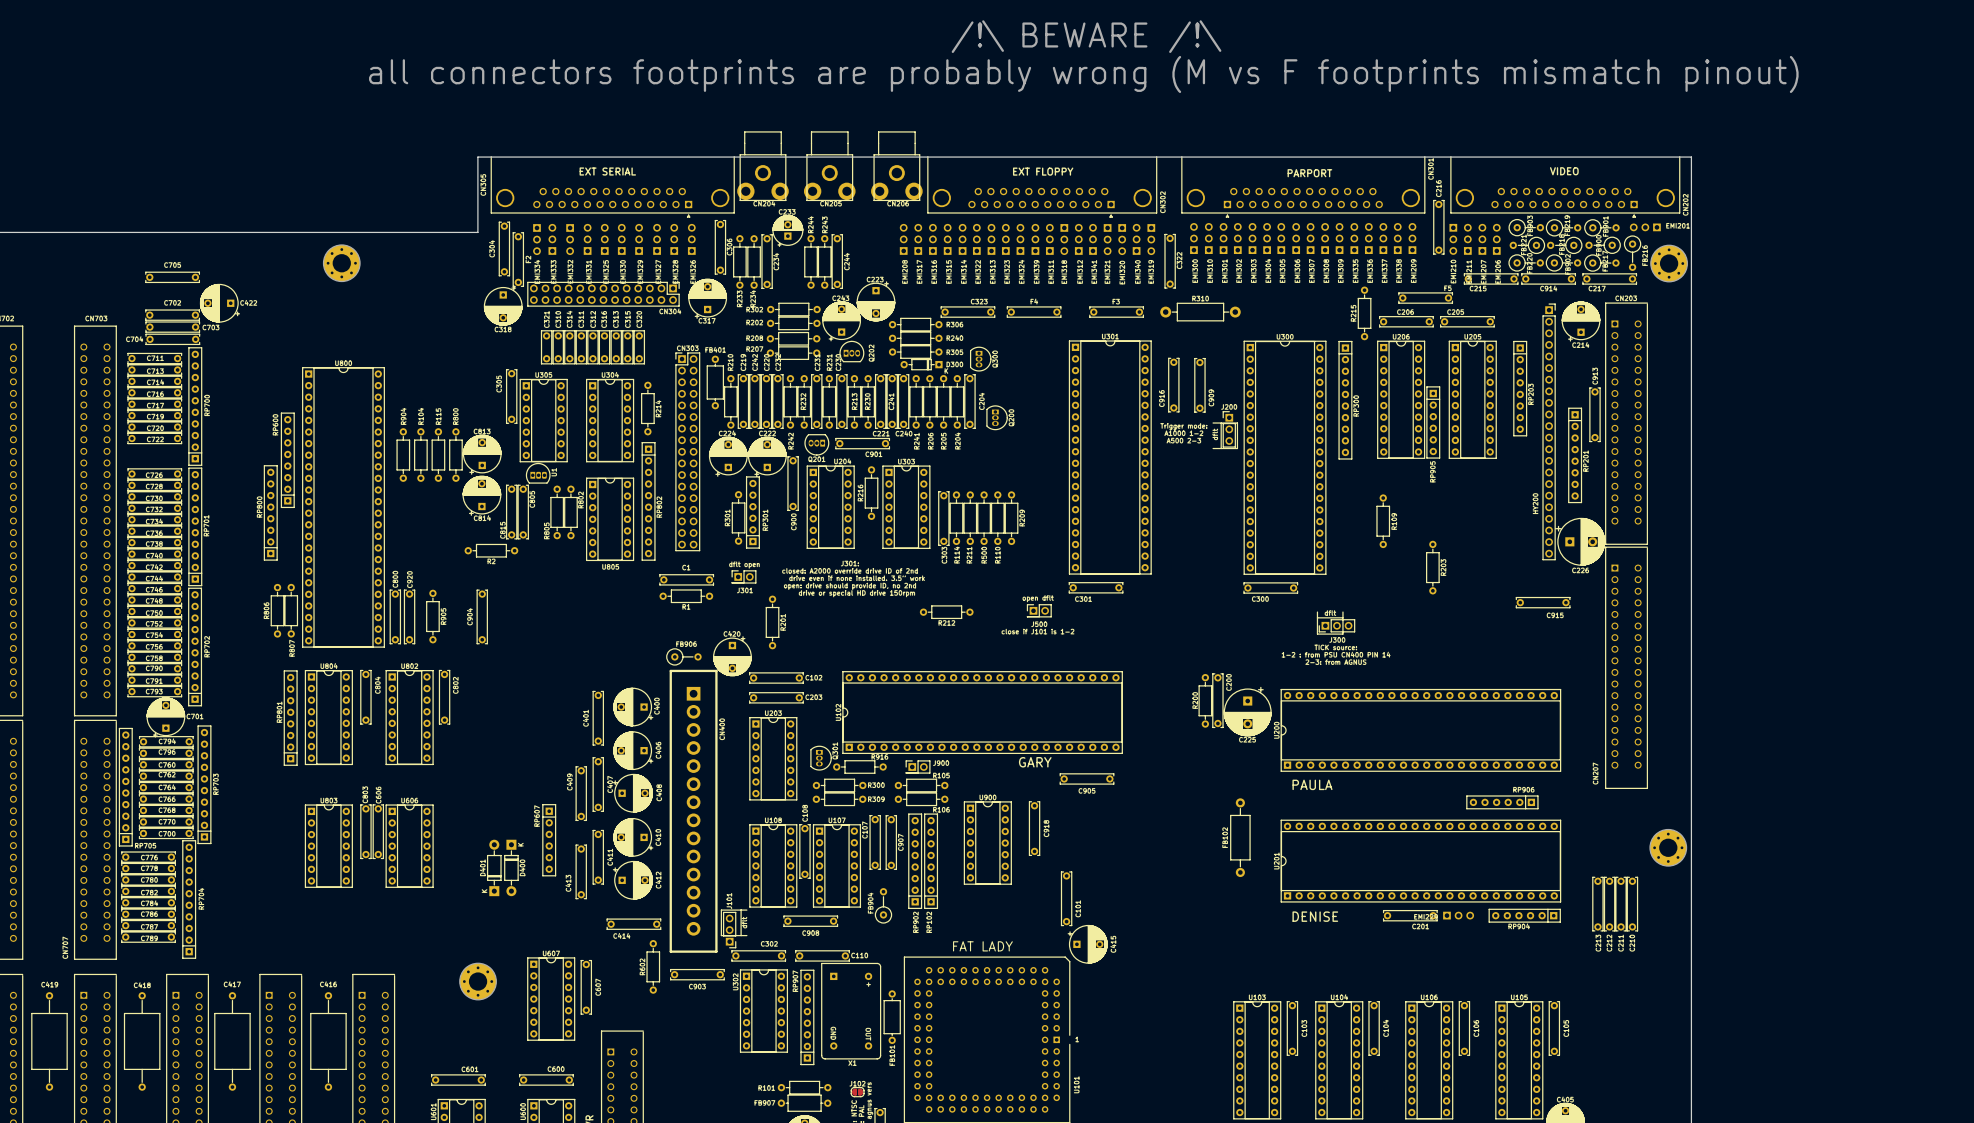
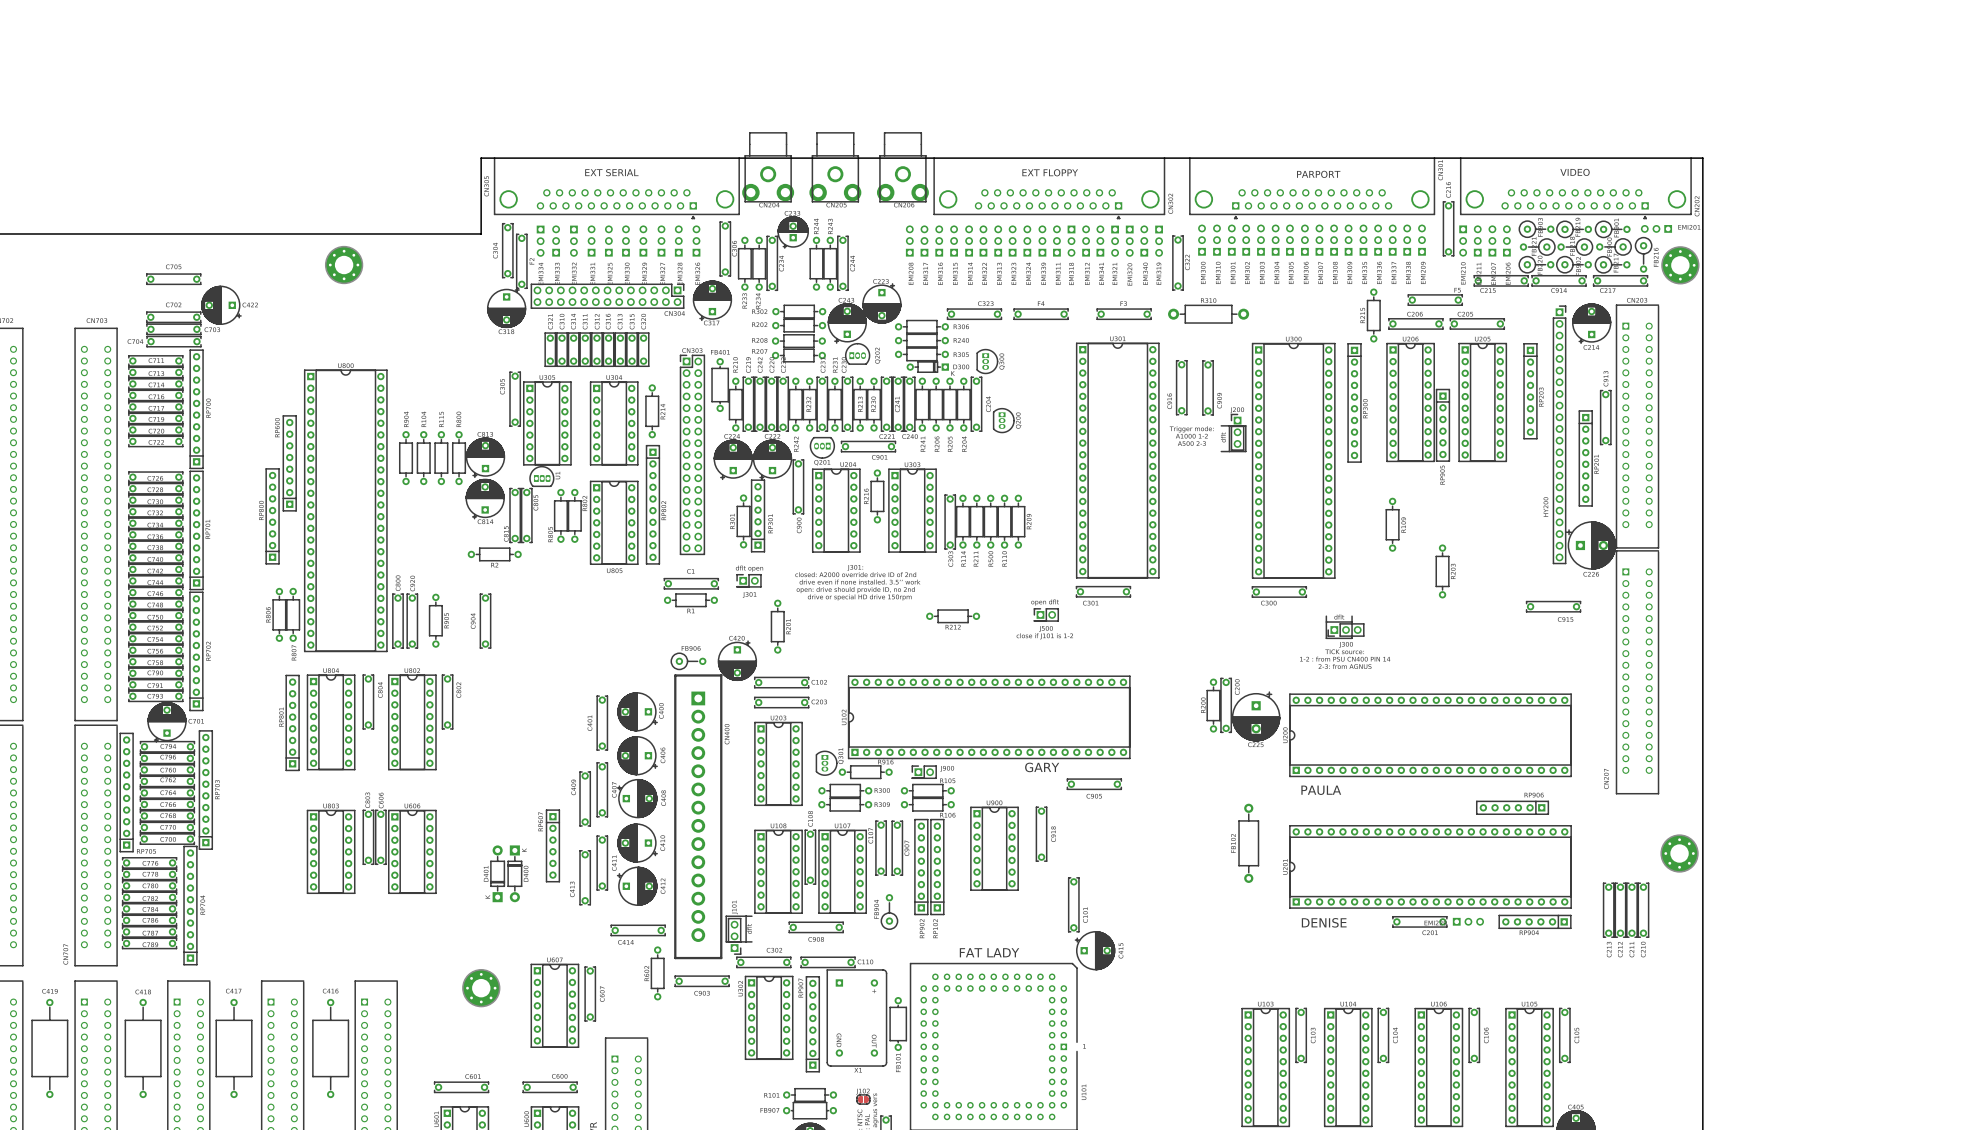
text: /!\ BEWARE /!\ (1086, 36) -> none
text: all connectors footprints are probably wrong (M vs F footprints mismatch pinout) (1083, 74) -> none

